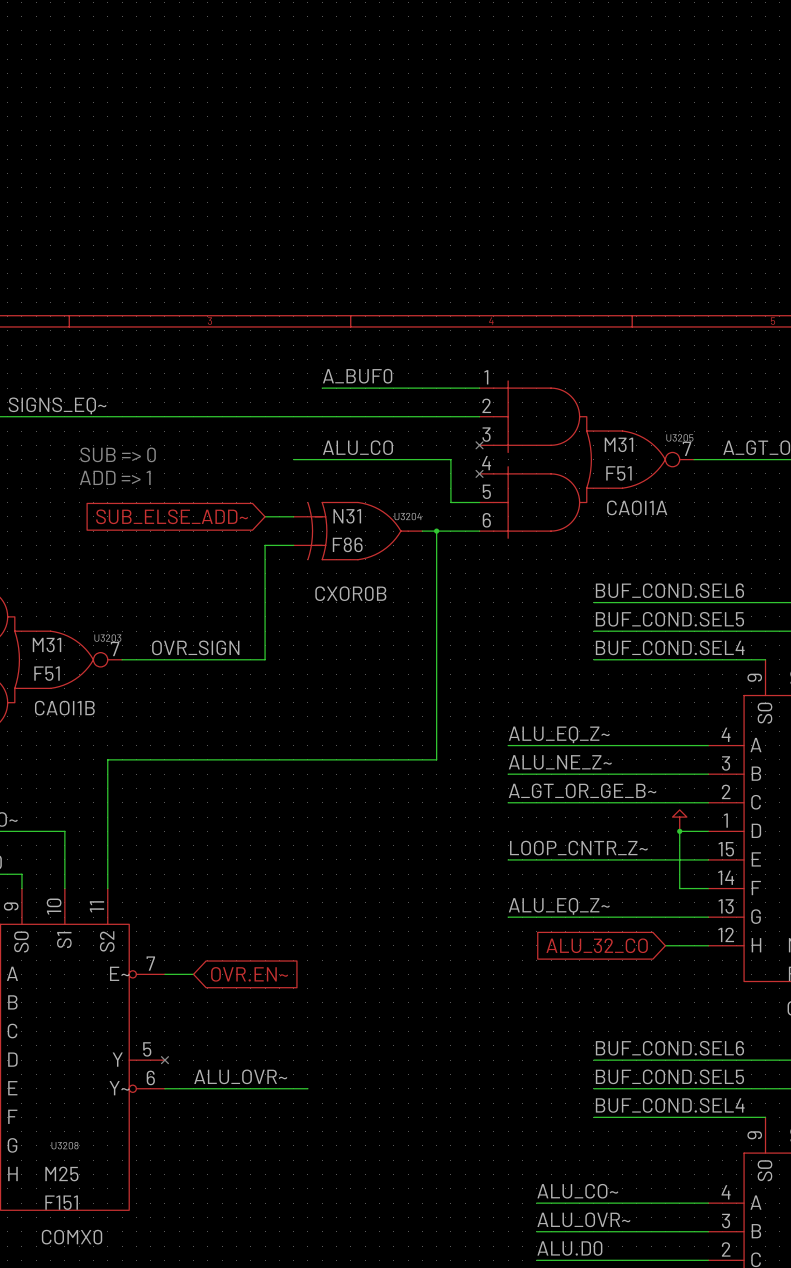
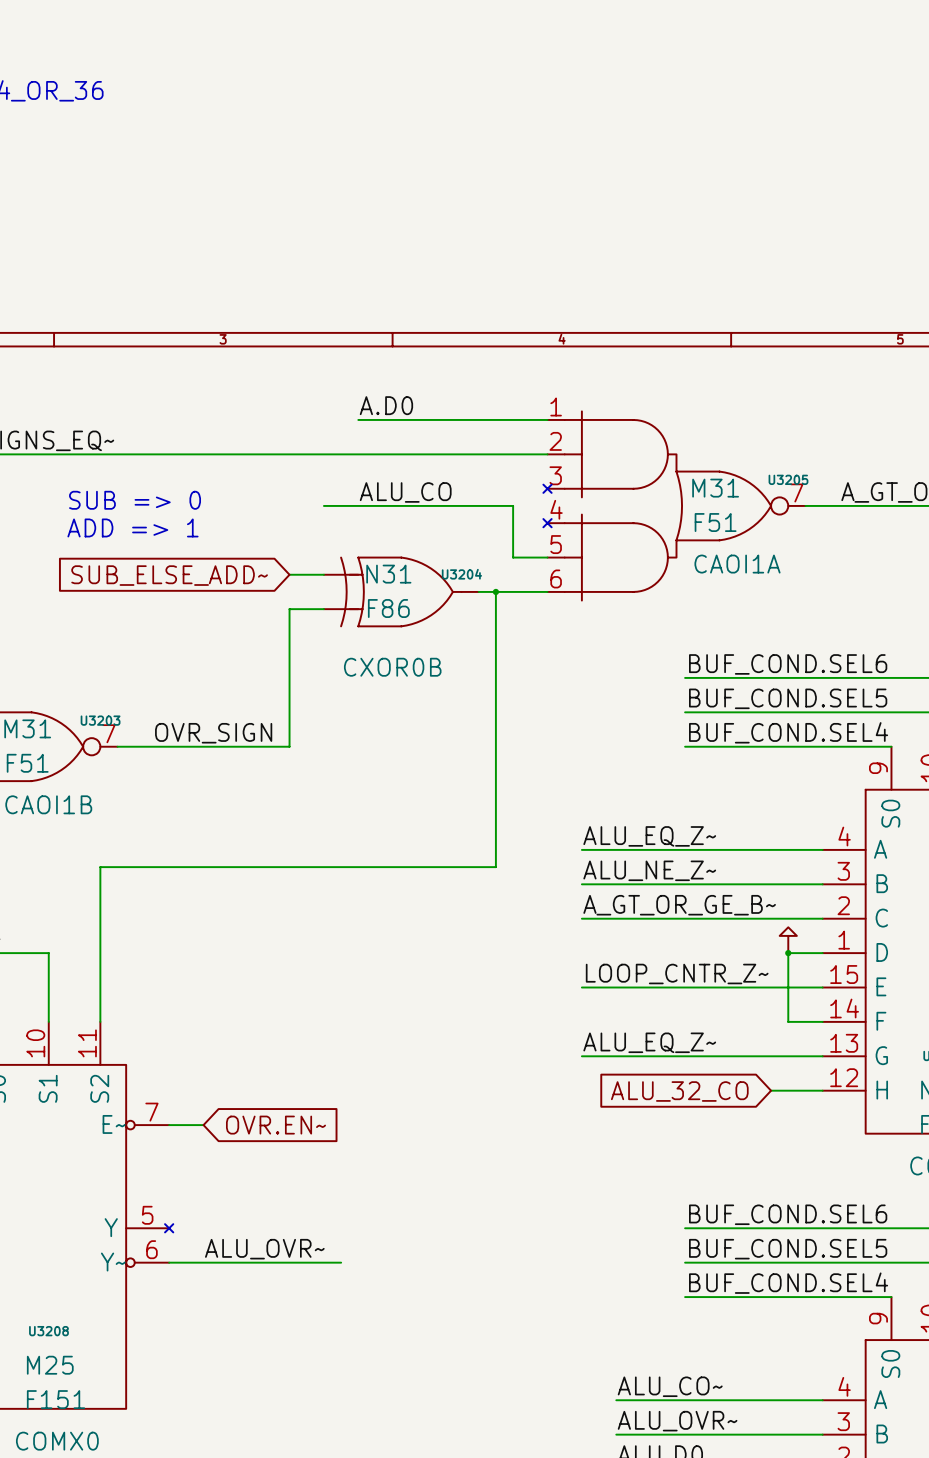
label: A_BUF0 (357, 376) -> A.D0 (386, 405)

